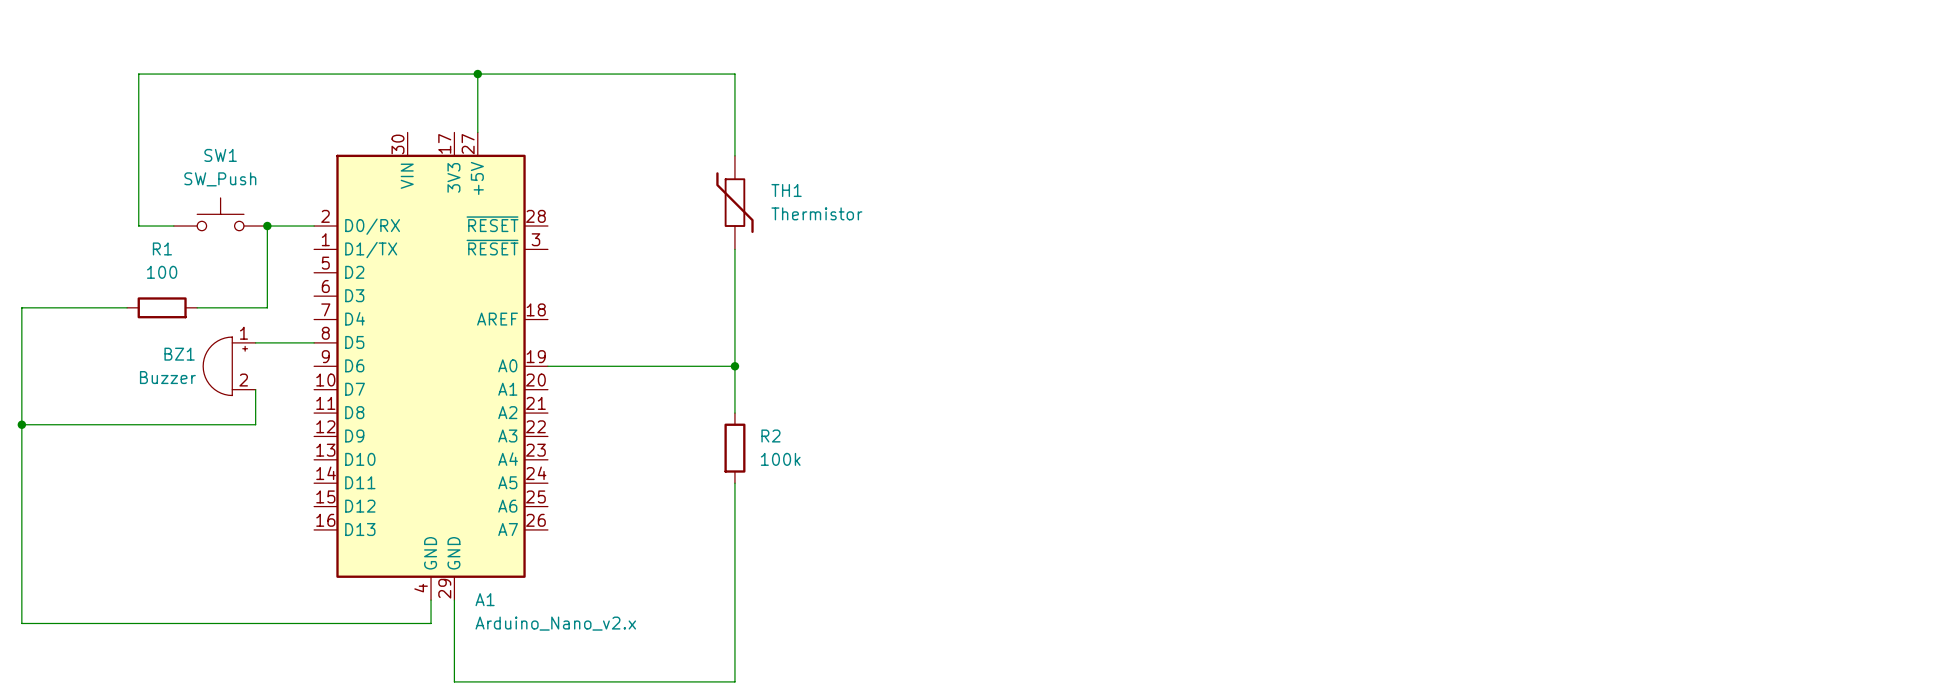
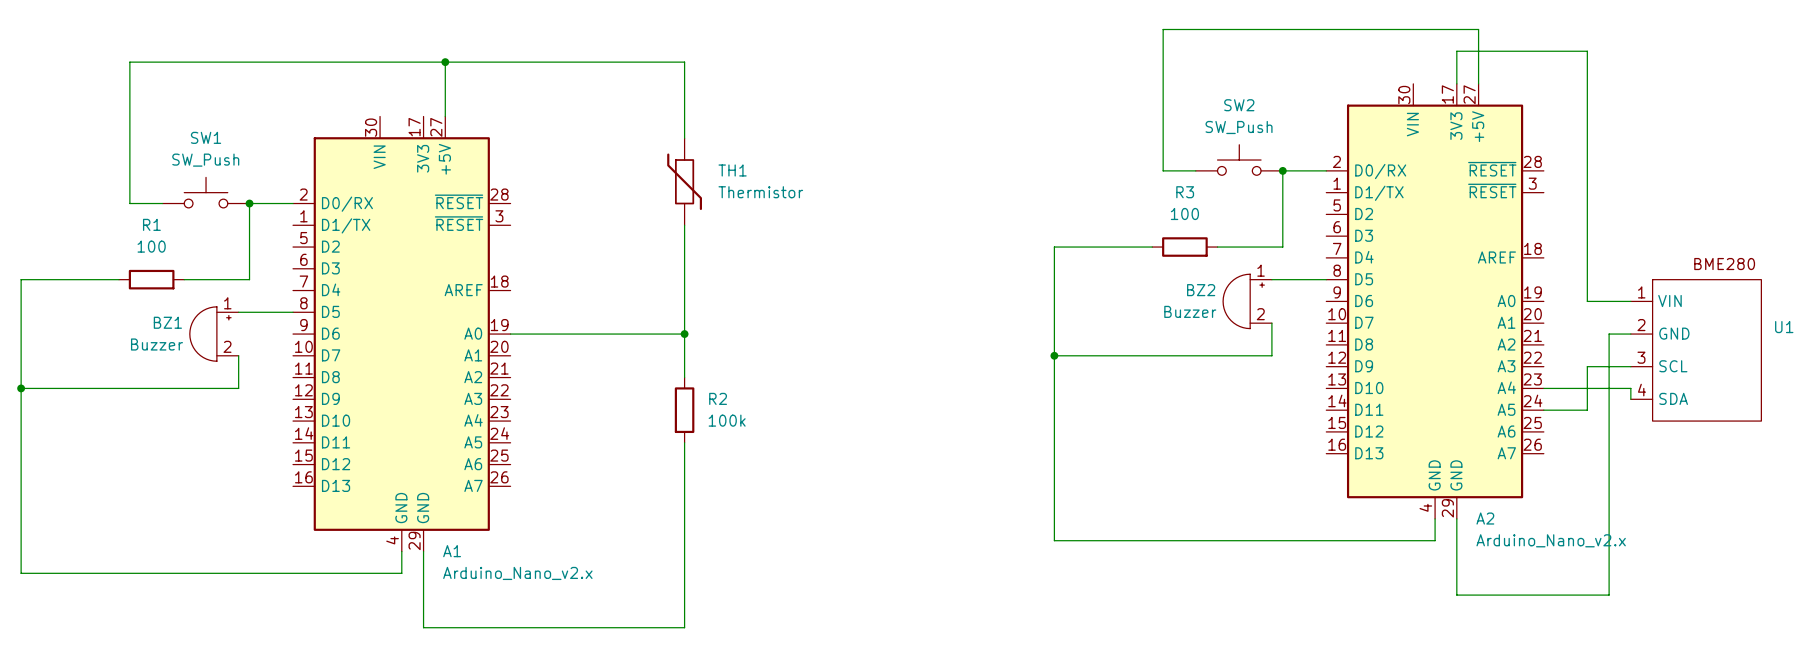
wire: none -> (1456, 83) (1456, 51) (1587, 51) (1587, 301) (1630, 301)
wire: none -> (1478, 83) (1478, 29) (1163, 29) (1163, 170) (1195, 170)
SW2: none -> SW_Push (1239, 160)
junction: none -> (1282, 170)
wire: none -> (1326, 170) (1282, 170) (1282, 247) (1217, 247)
wire: none -> (1152, 247) (1054, 247) (1054, 540) (1435, 540) (1435, 518)
R3: none -> 100 (1184, 247)
wire: none -> (1271, 279) (1326, 279)
BZ2: none -> Buzzer (1247, 301)
A2: none -> Arduino_Nano_v2.x (1435, 301)
wire: none -> (1271, 323) (1271, 355) (1054, 355)
wire: none -> (1630, 334) (1609, 334) (1609, 595) (1456, 595) (1456, 518)
U1: none -> (1696, 350)
junction: none -> (1054, 355)
wire: none -> (1630, 366) (1587, 366) (1587, 410) (1543, 410)
wire: none -> (1543, 388) (1630, 388) (1630, 399)

